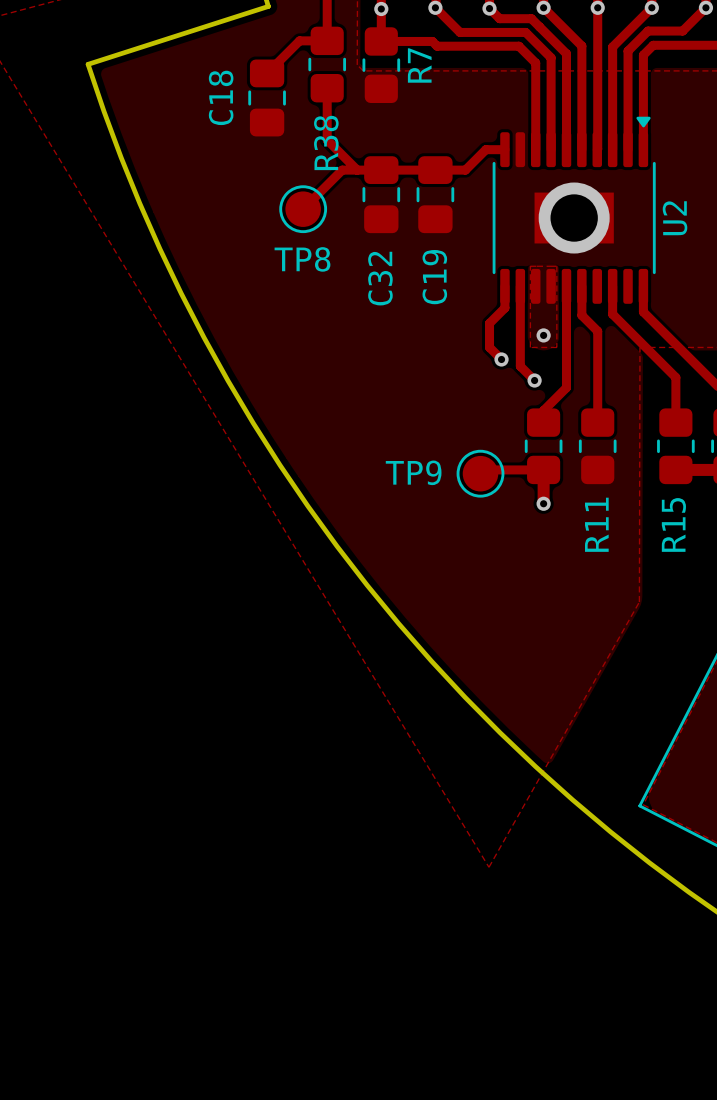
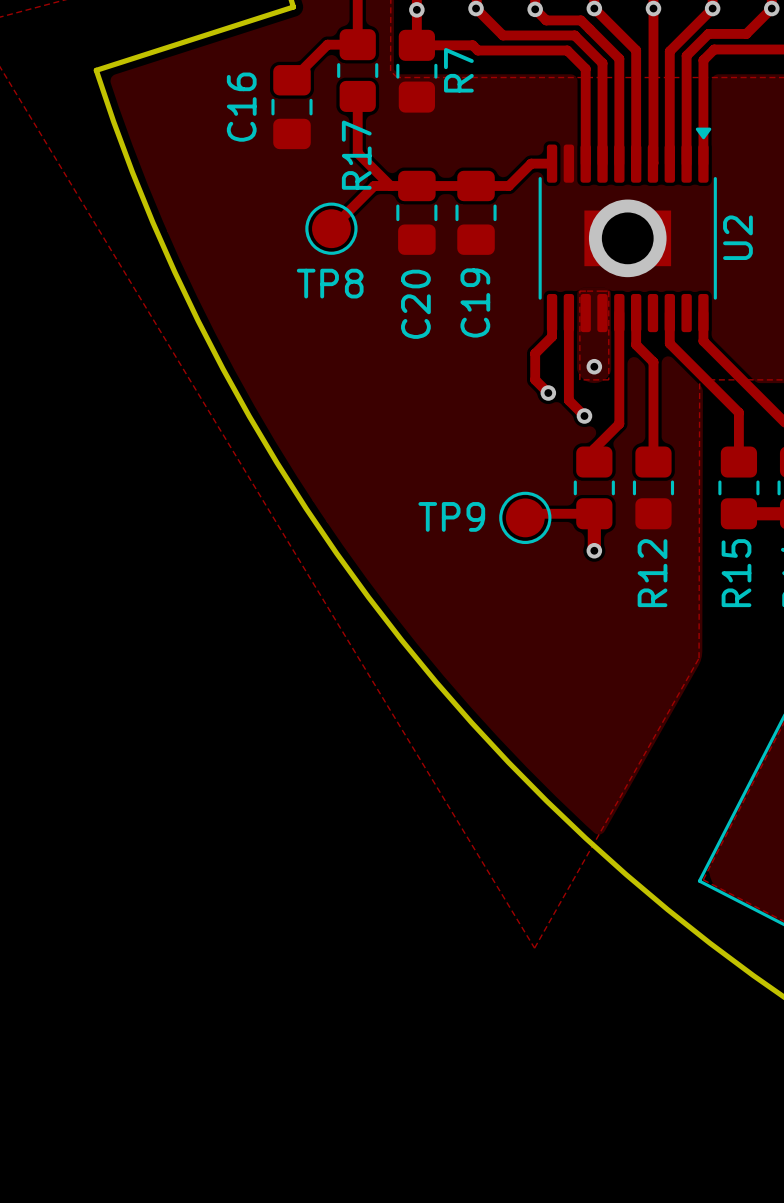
C18 name: C18 (221, 97) -> C16 (241, 107)
R38 name: R38 (326, 142) -> R17 (356, 155)
C32 name: C32 (380, 278) -> C20 (415, 304)
R11 name: R11 (596, 524) -> R12 (652, 573)

